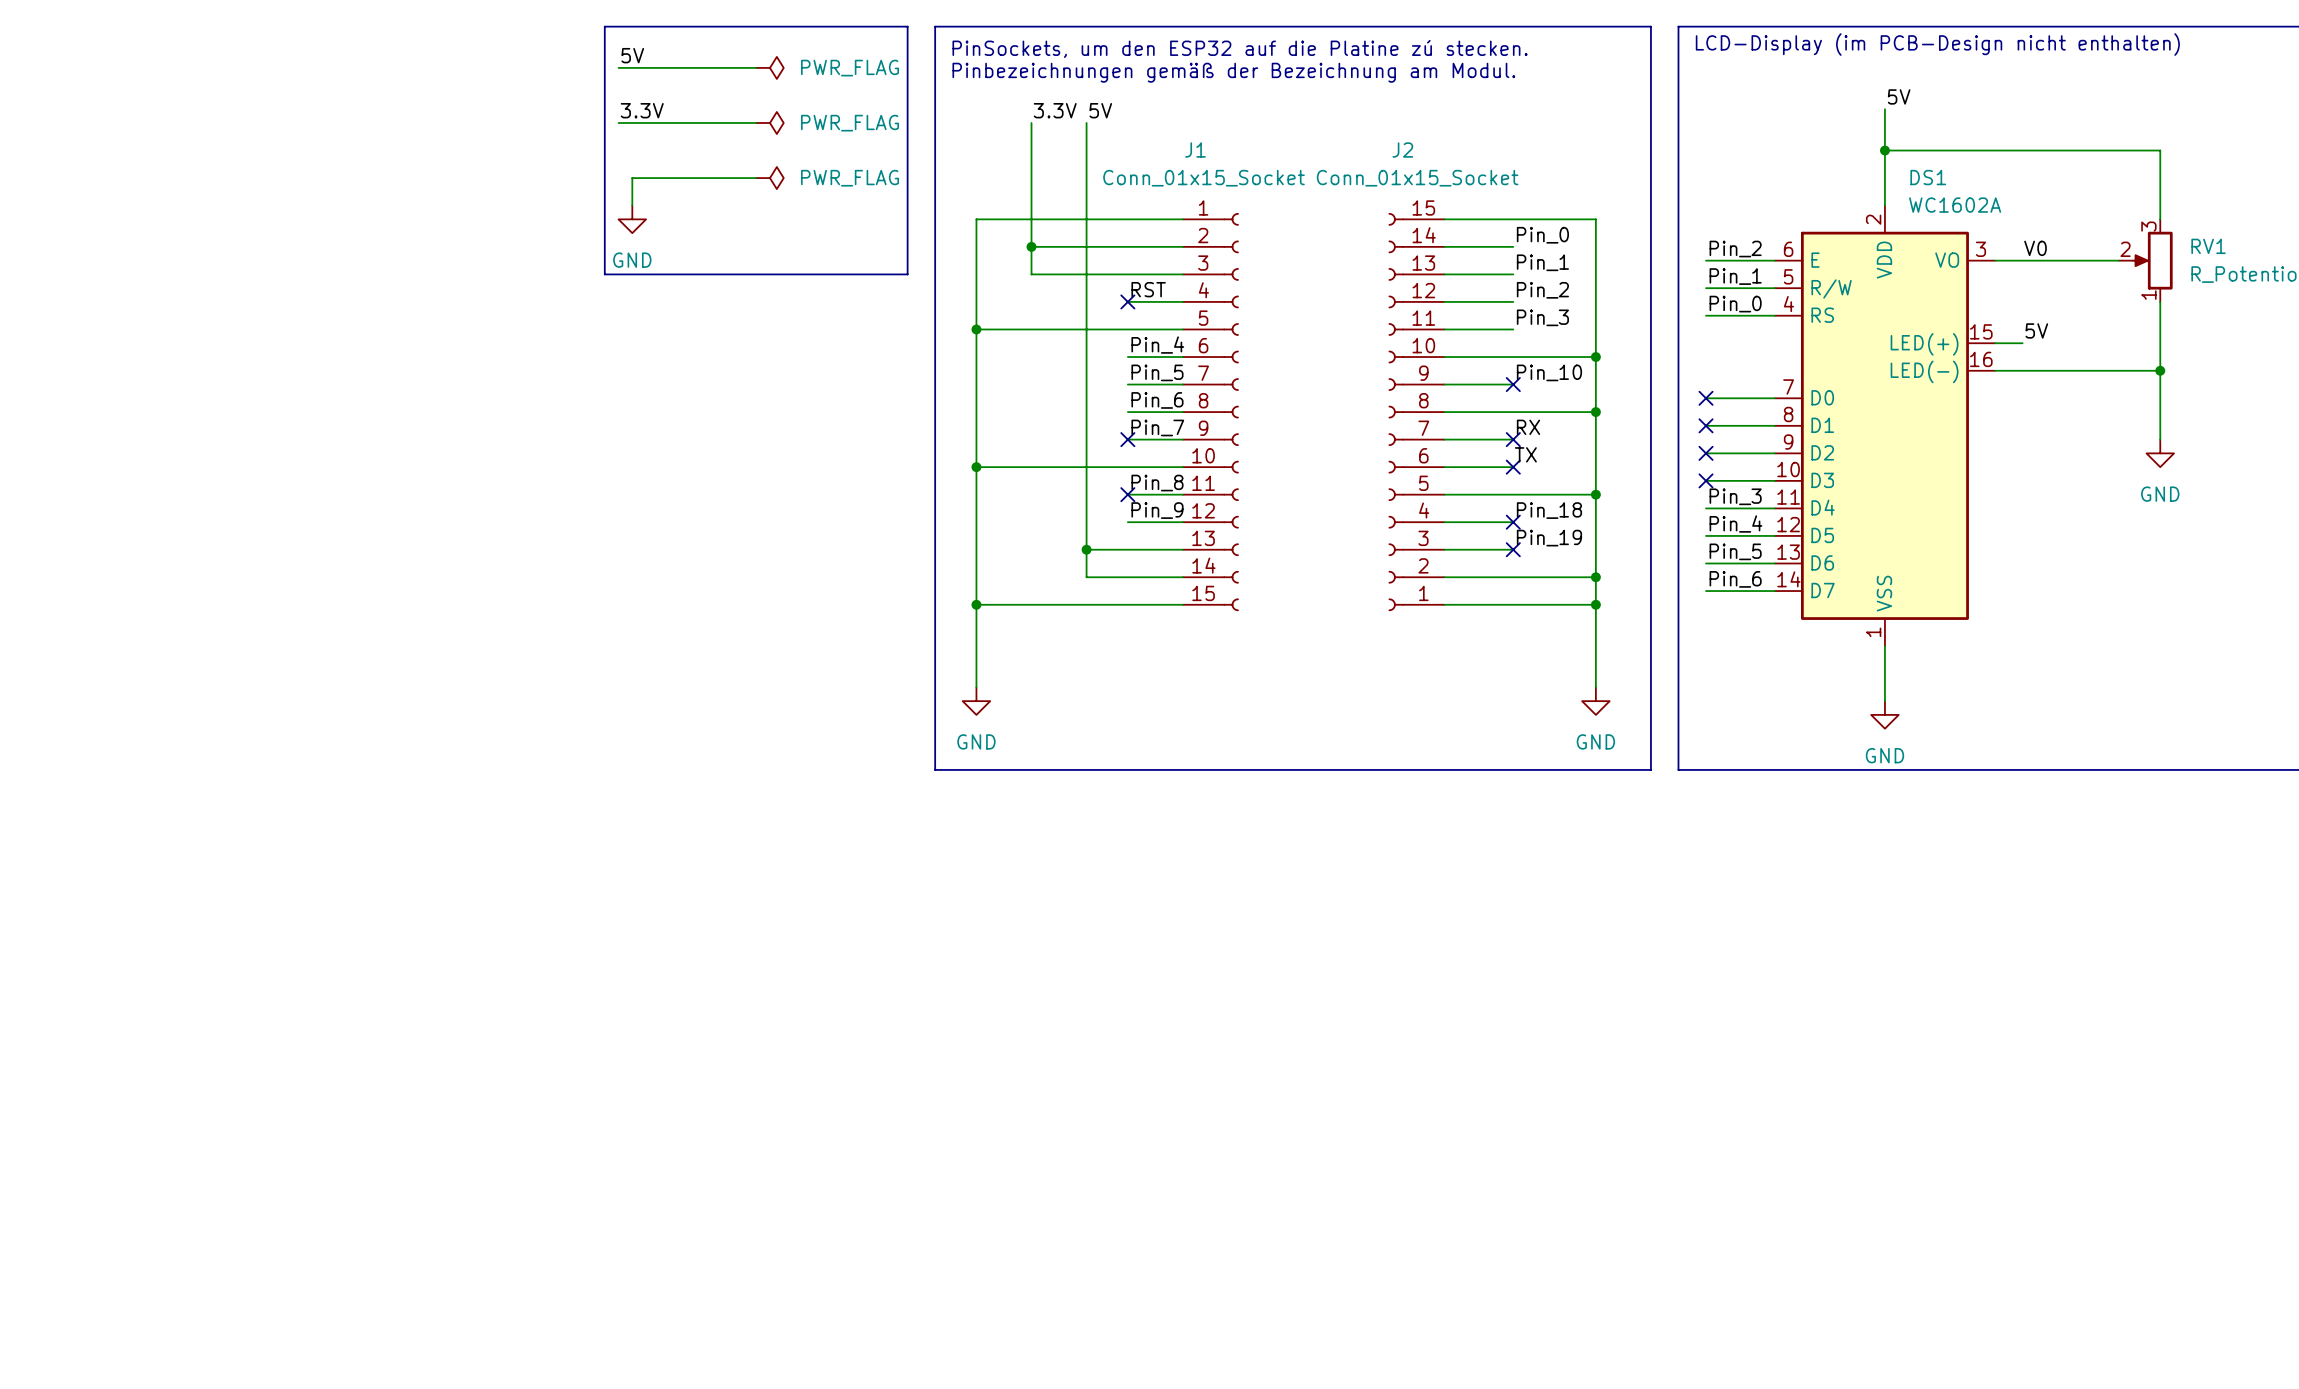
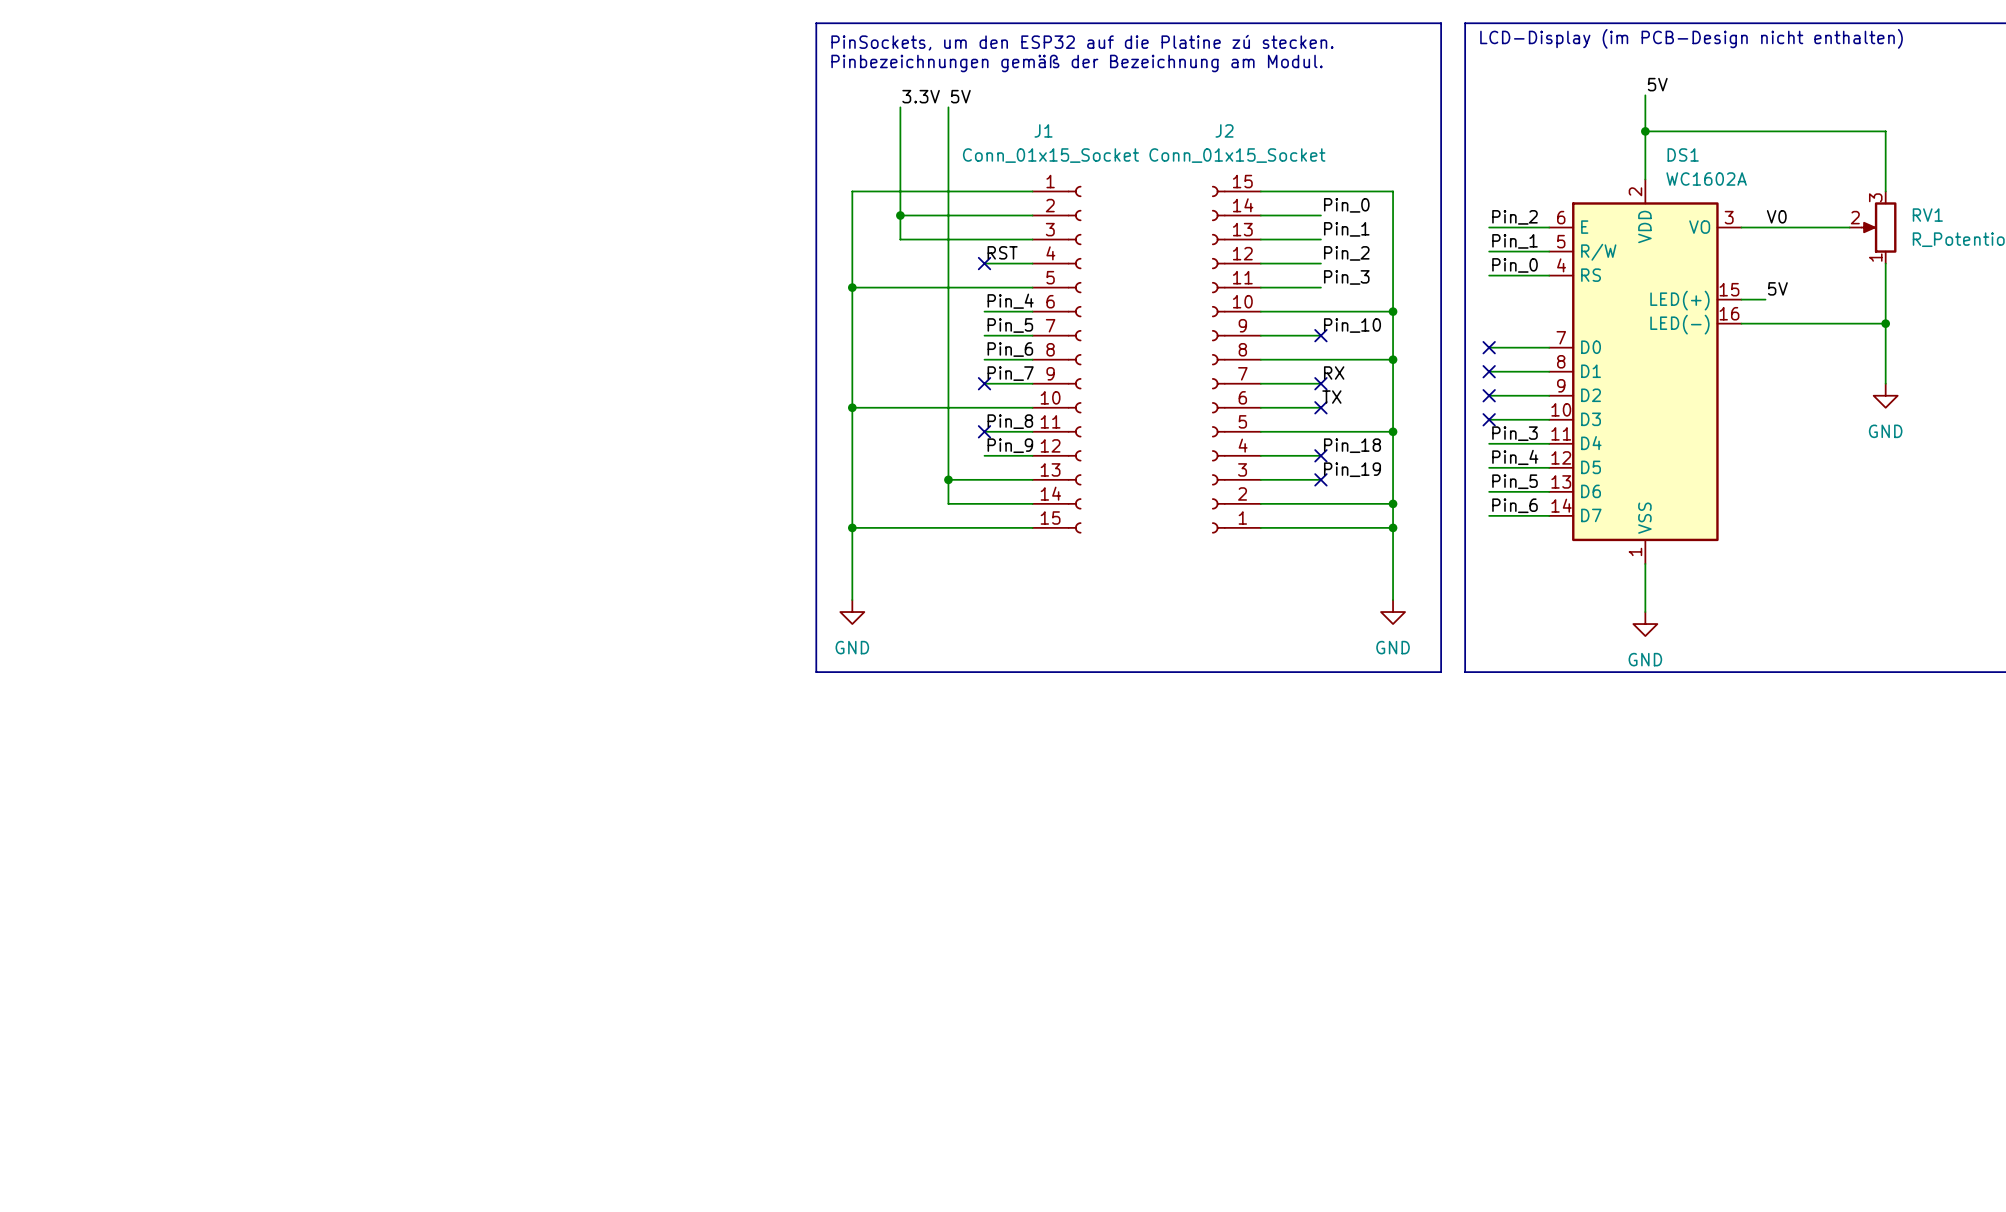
line: (604, 26) (604, 274) (907, 274) (907, 26) (604, 26) -> none
label: 5V (632, 55) -> none
wire: (618, 67) (756, 67) -> none
power symbol: PWR_FLAG (769, 67) -> none
label: 3.3V (642, 110) -> none
wire: (618, 123) (756, 123) -> none
power symbol: PWR_FLAG (769, 123) -> none
wire: (756, 178) (632, 178) (632, 205) -> none
power symbol: PWR_FLAG (769, 178) -> none
power symbol: GND (632, 219) -> none

